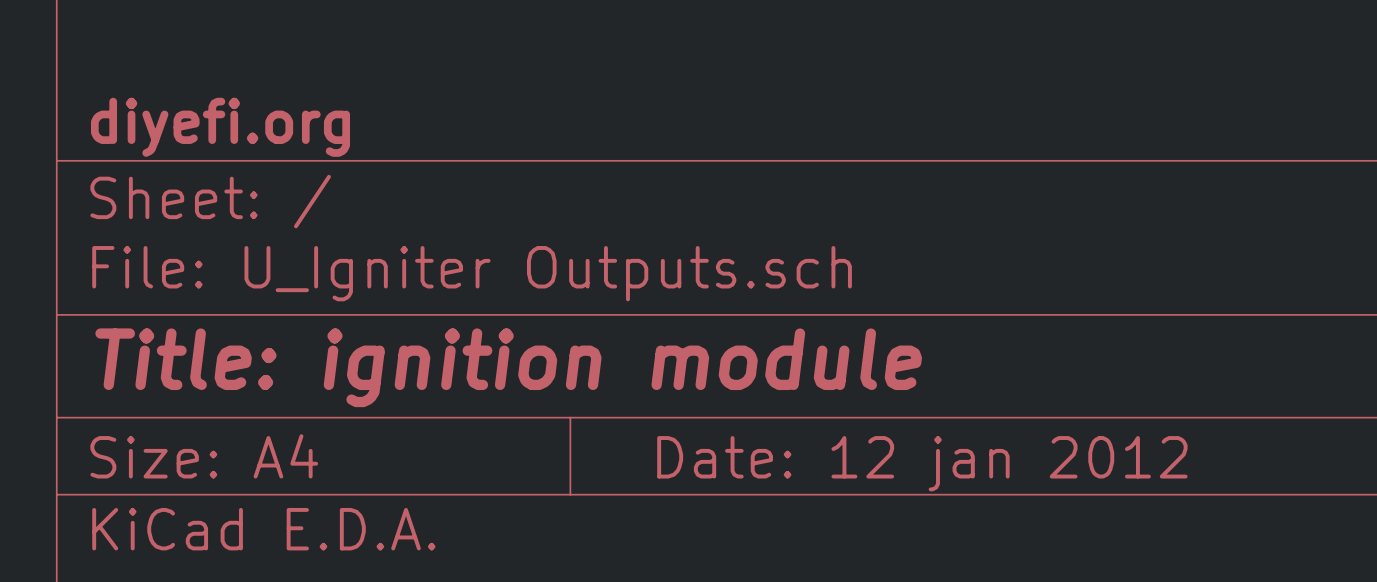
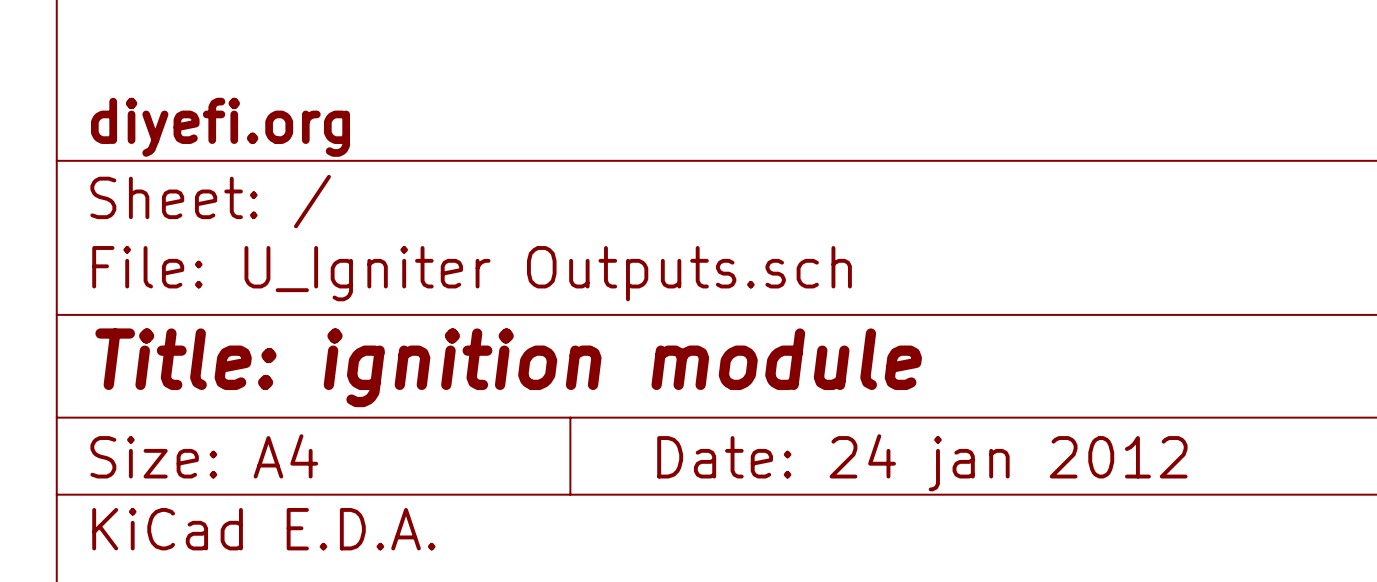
title block: Date: 12 jan 2012 (922, 463) -> Date: 24 jan 2012 (922, 462)

